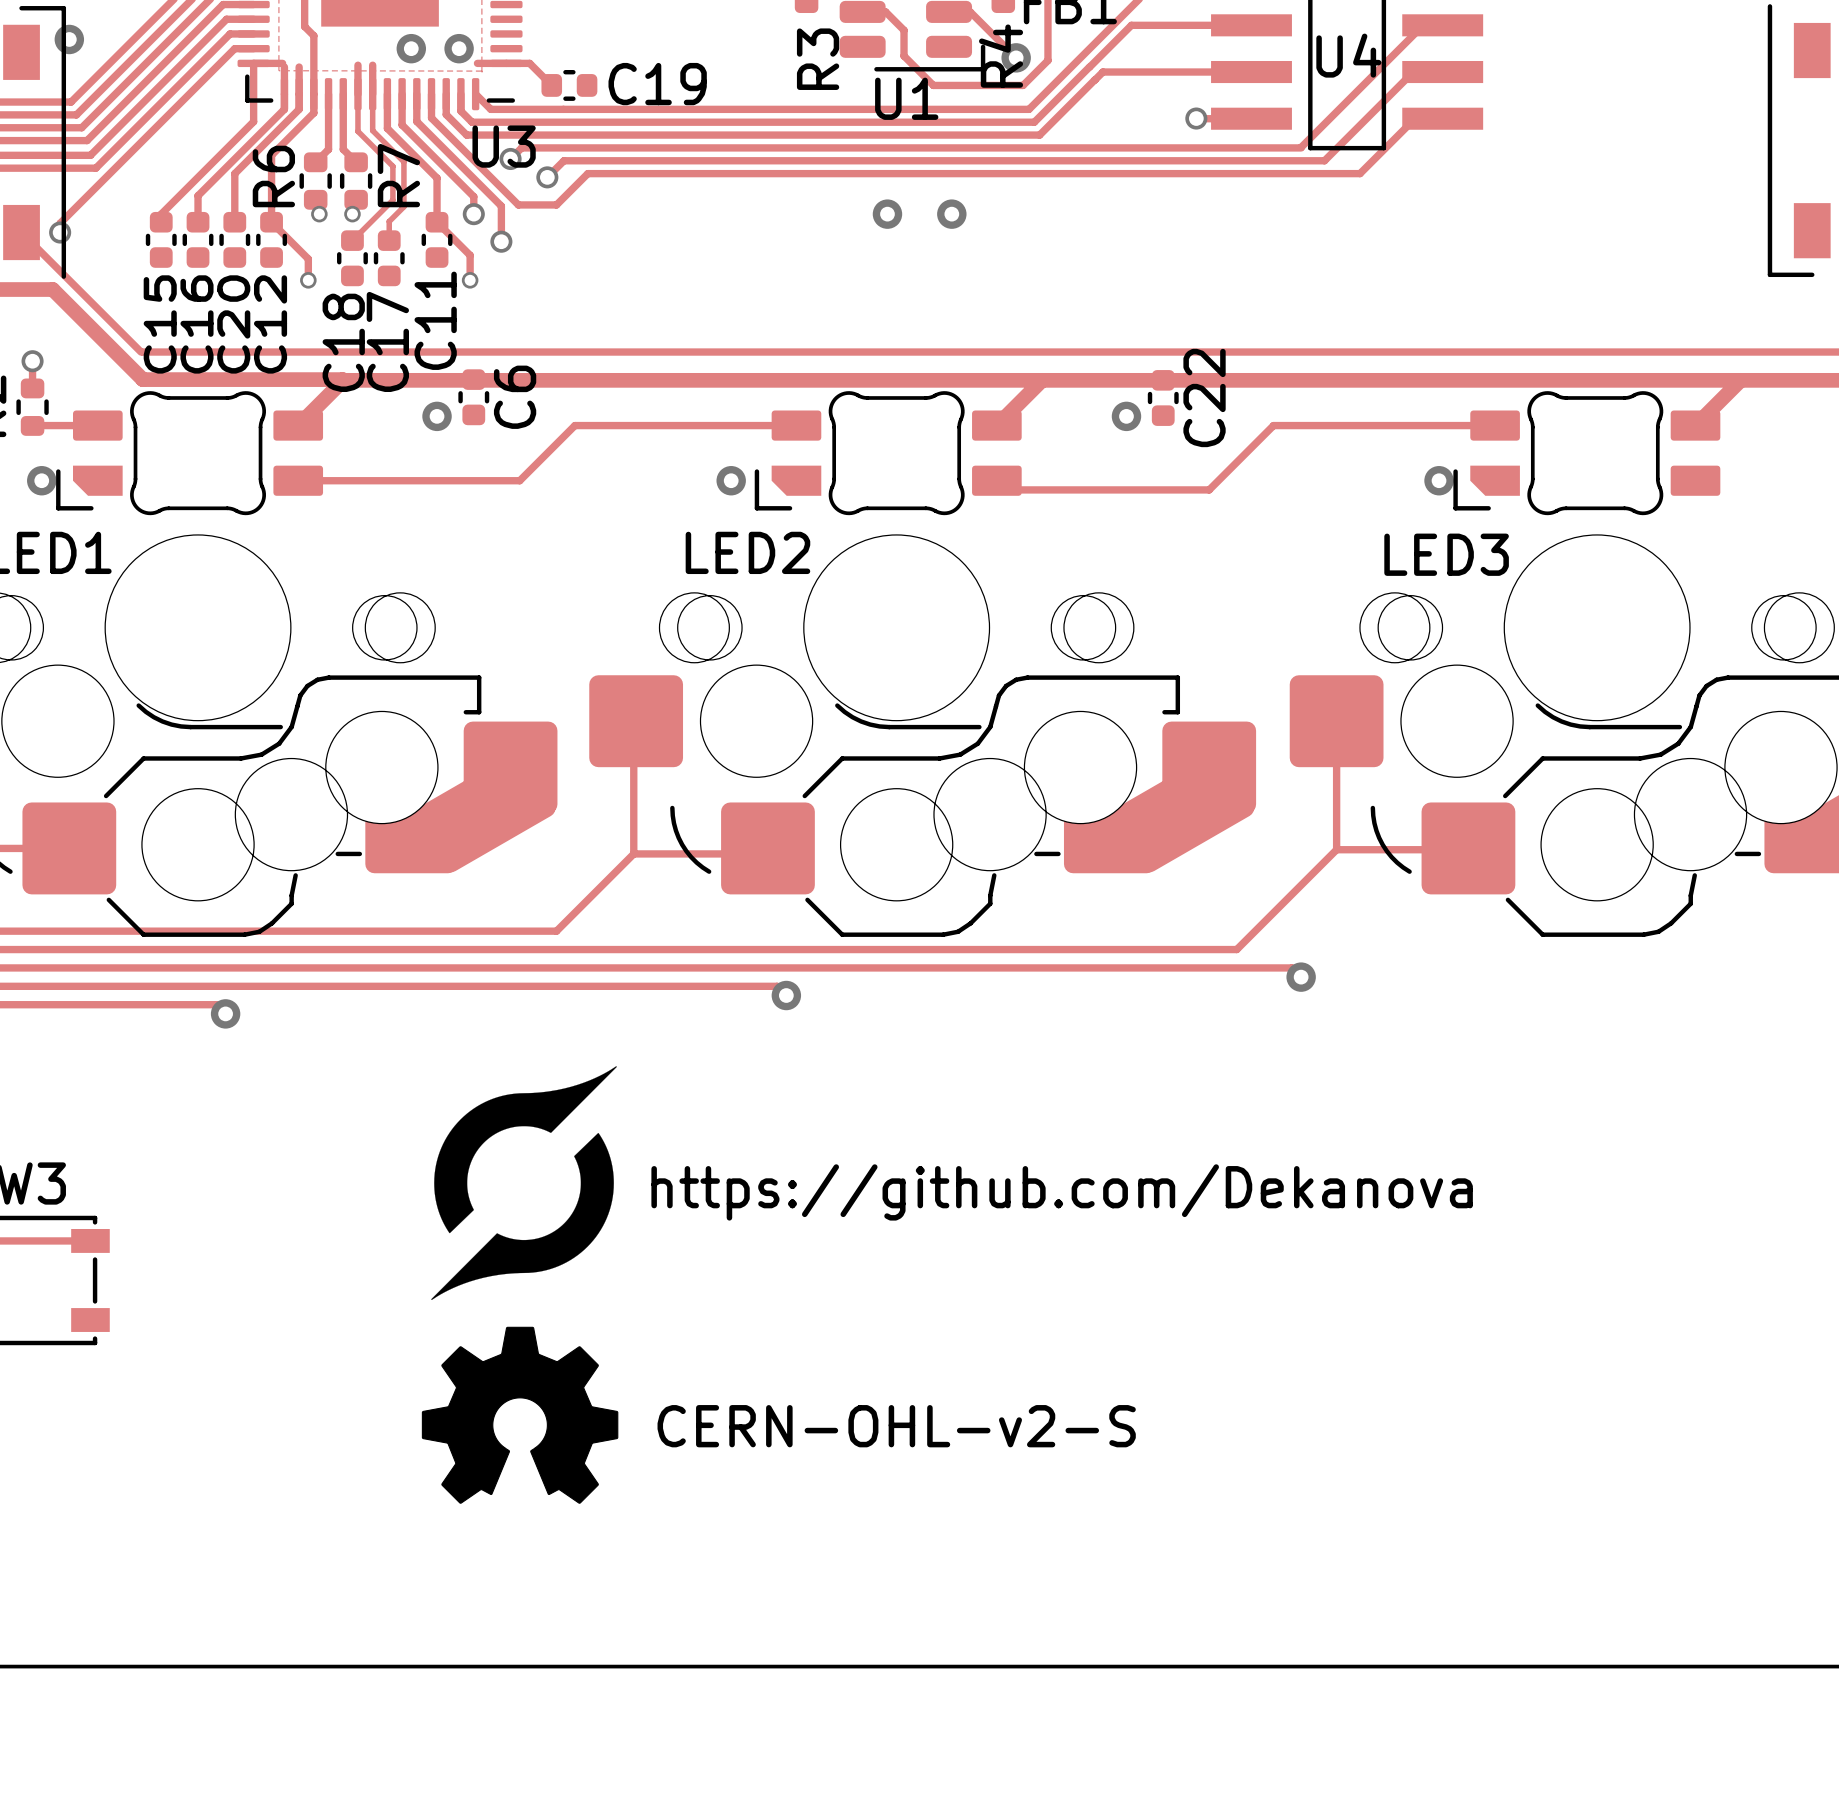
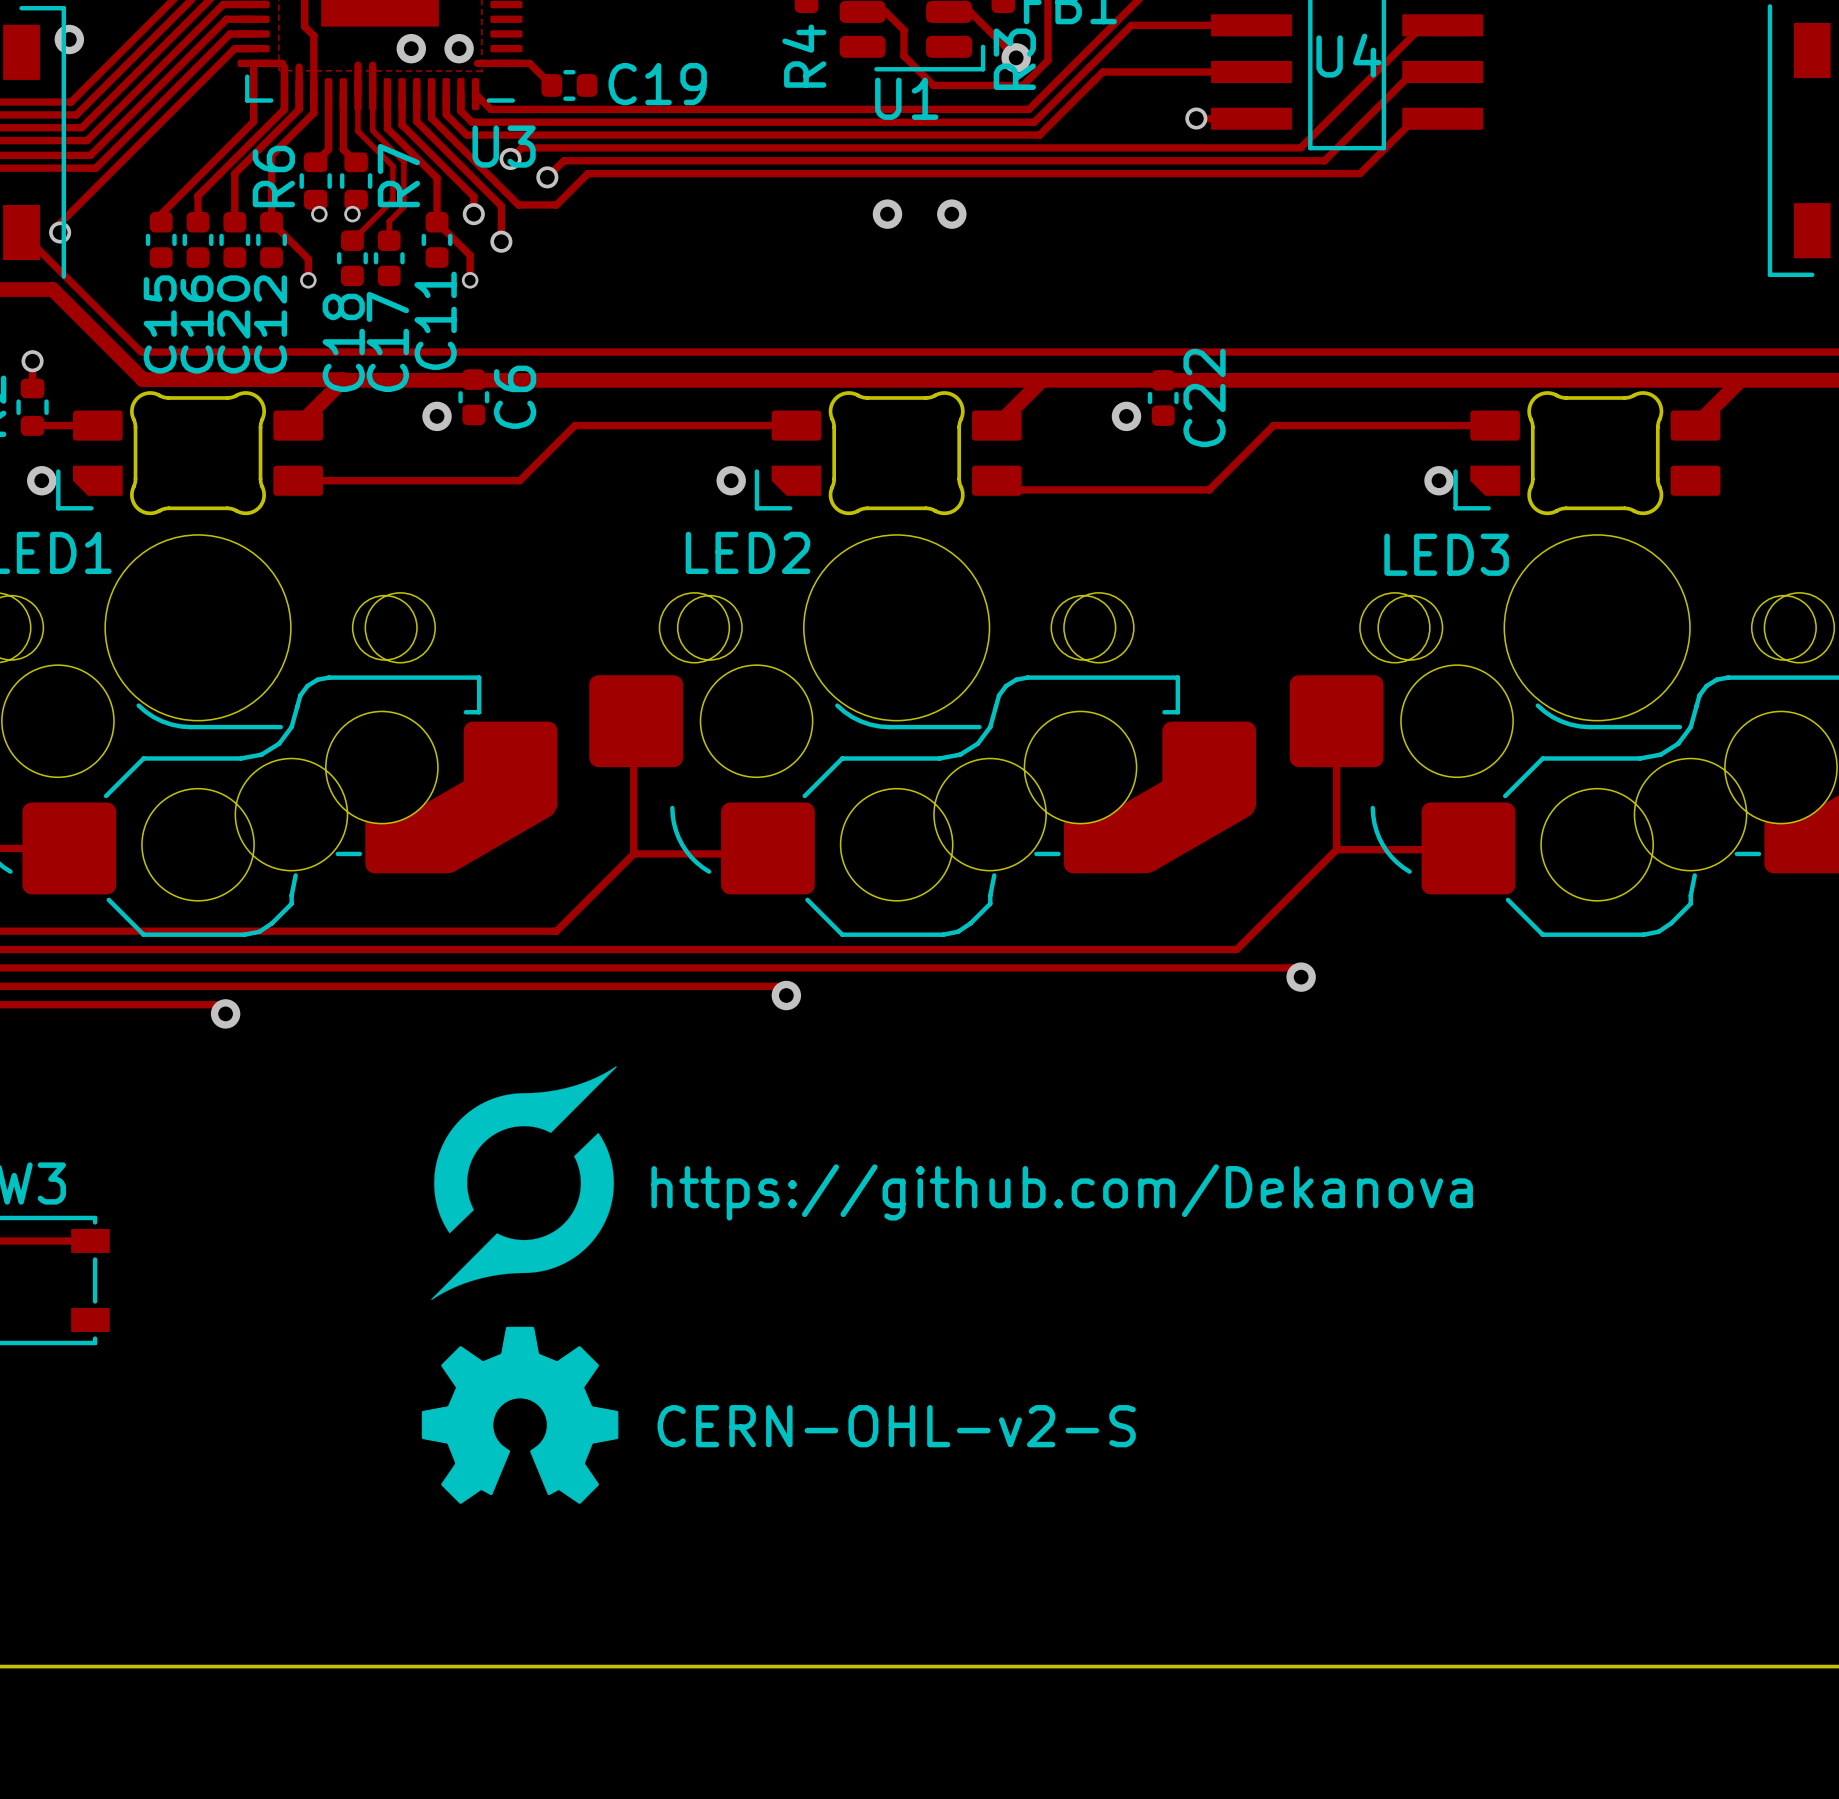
R4 name: R4 (1001, 56) -> R3 (1014, 59)
R3 name: R3 (818, 59) -> R4 (804, 56)

